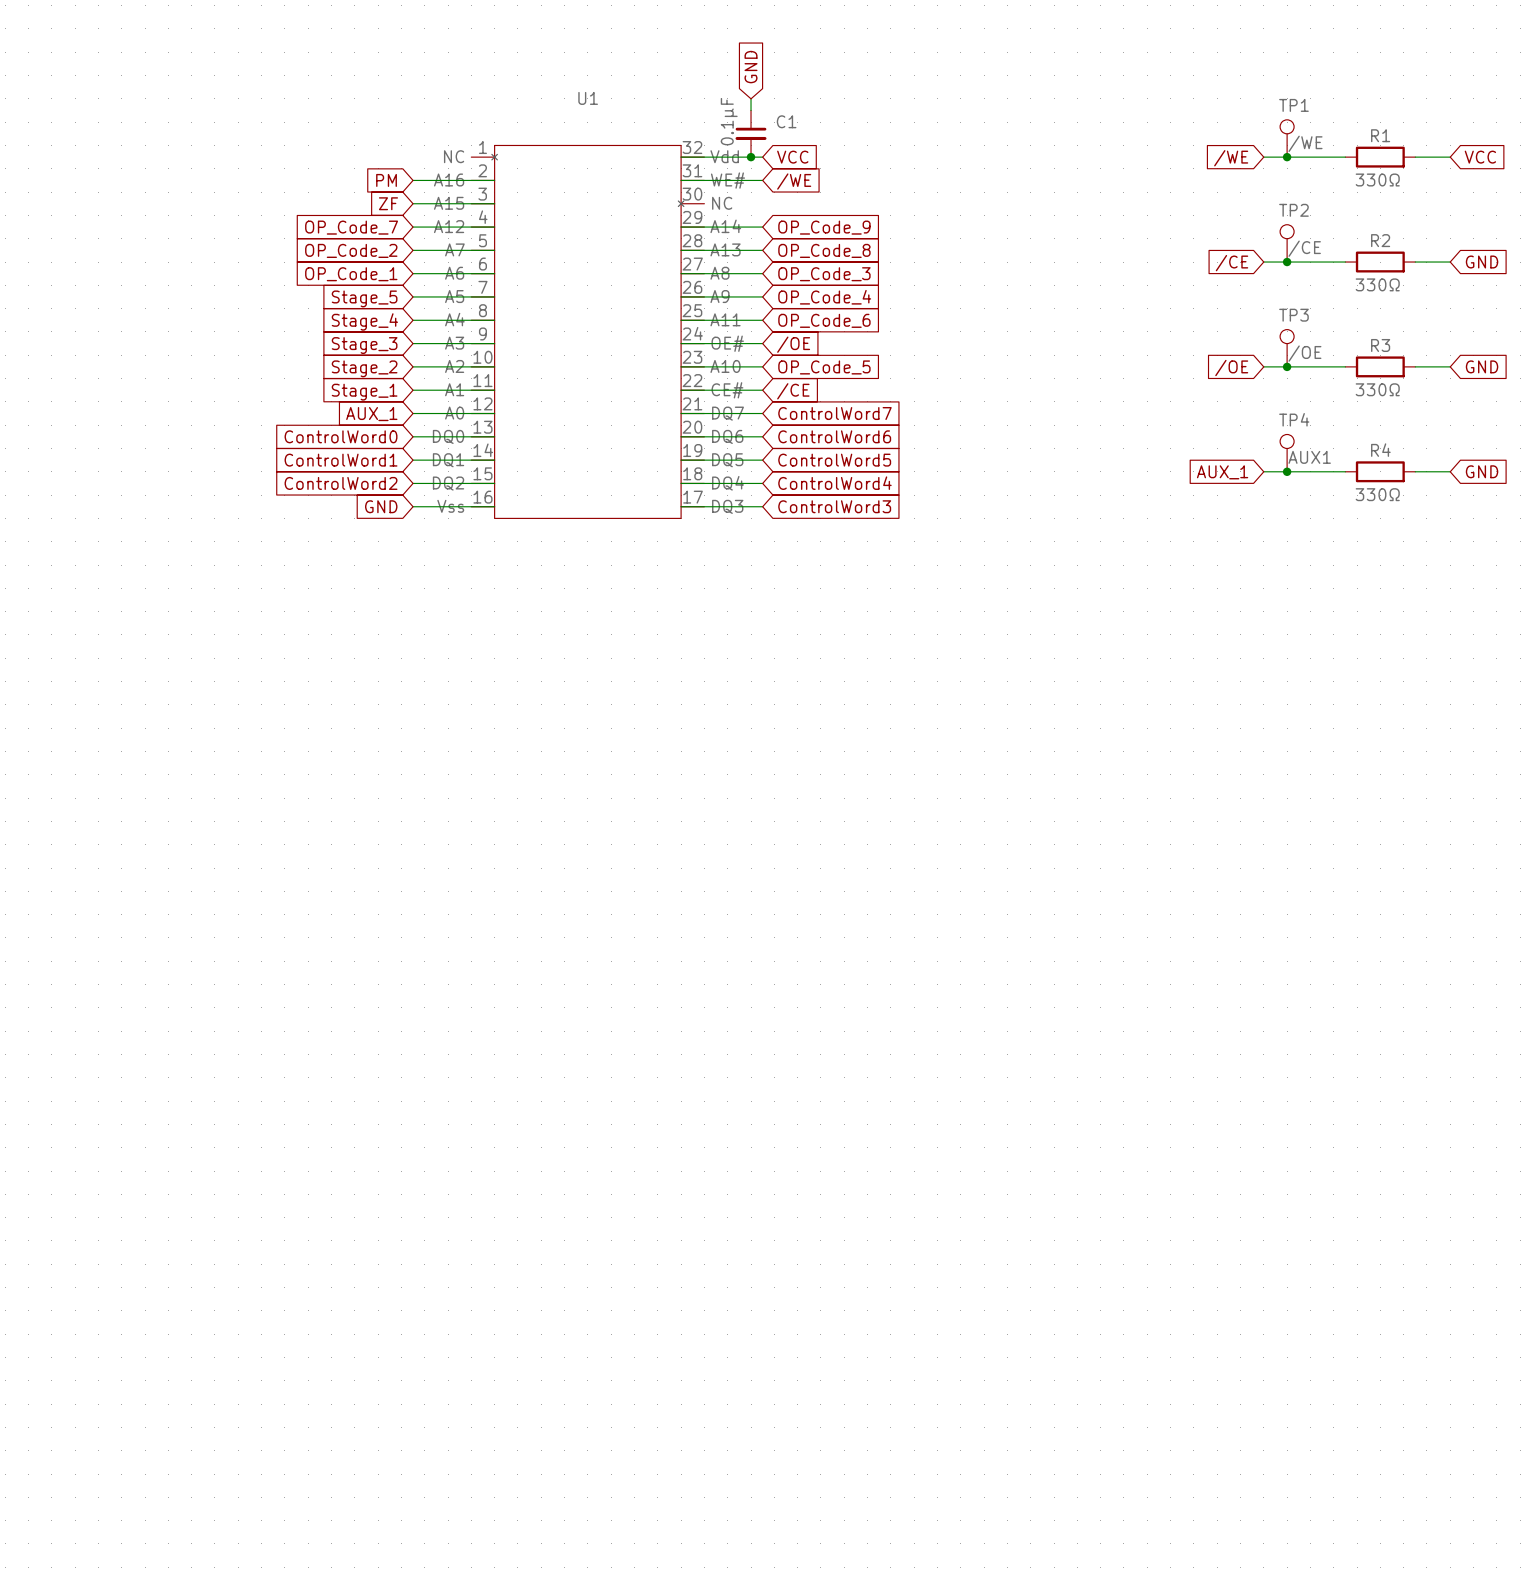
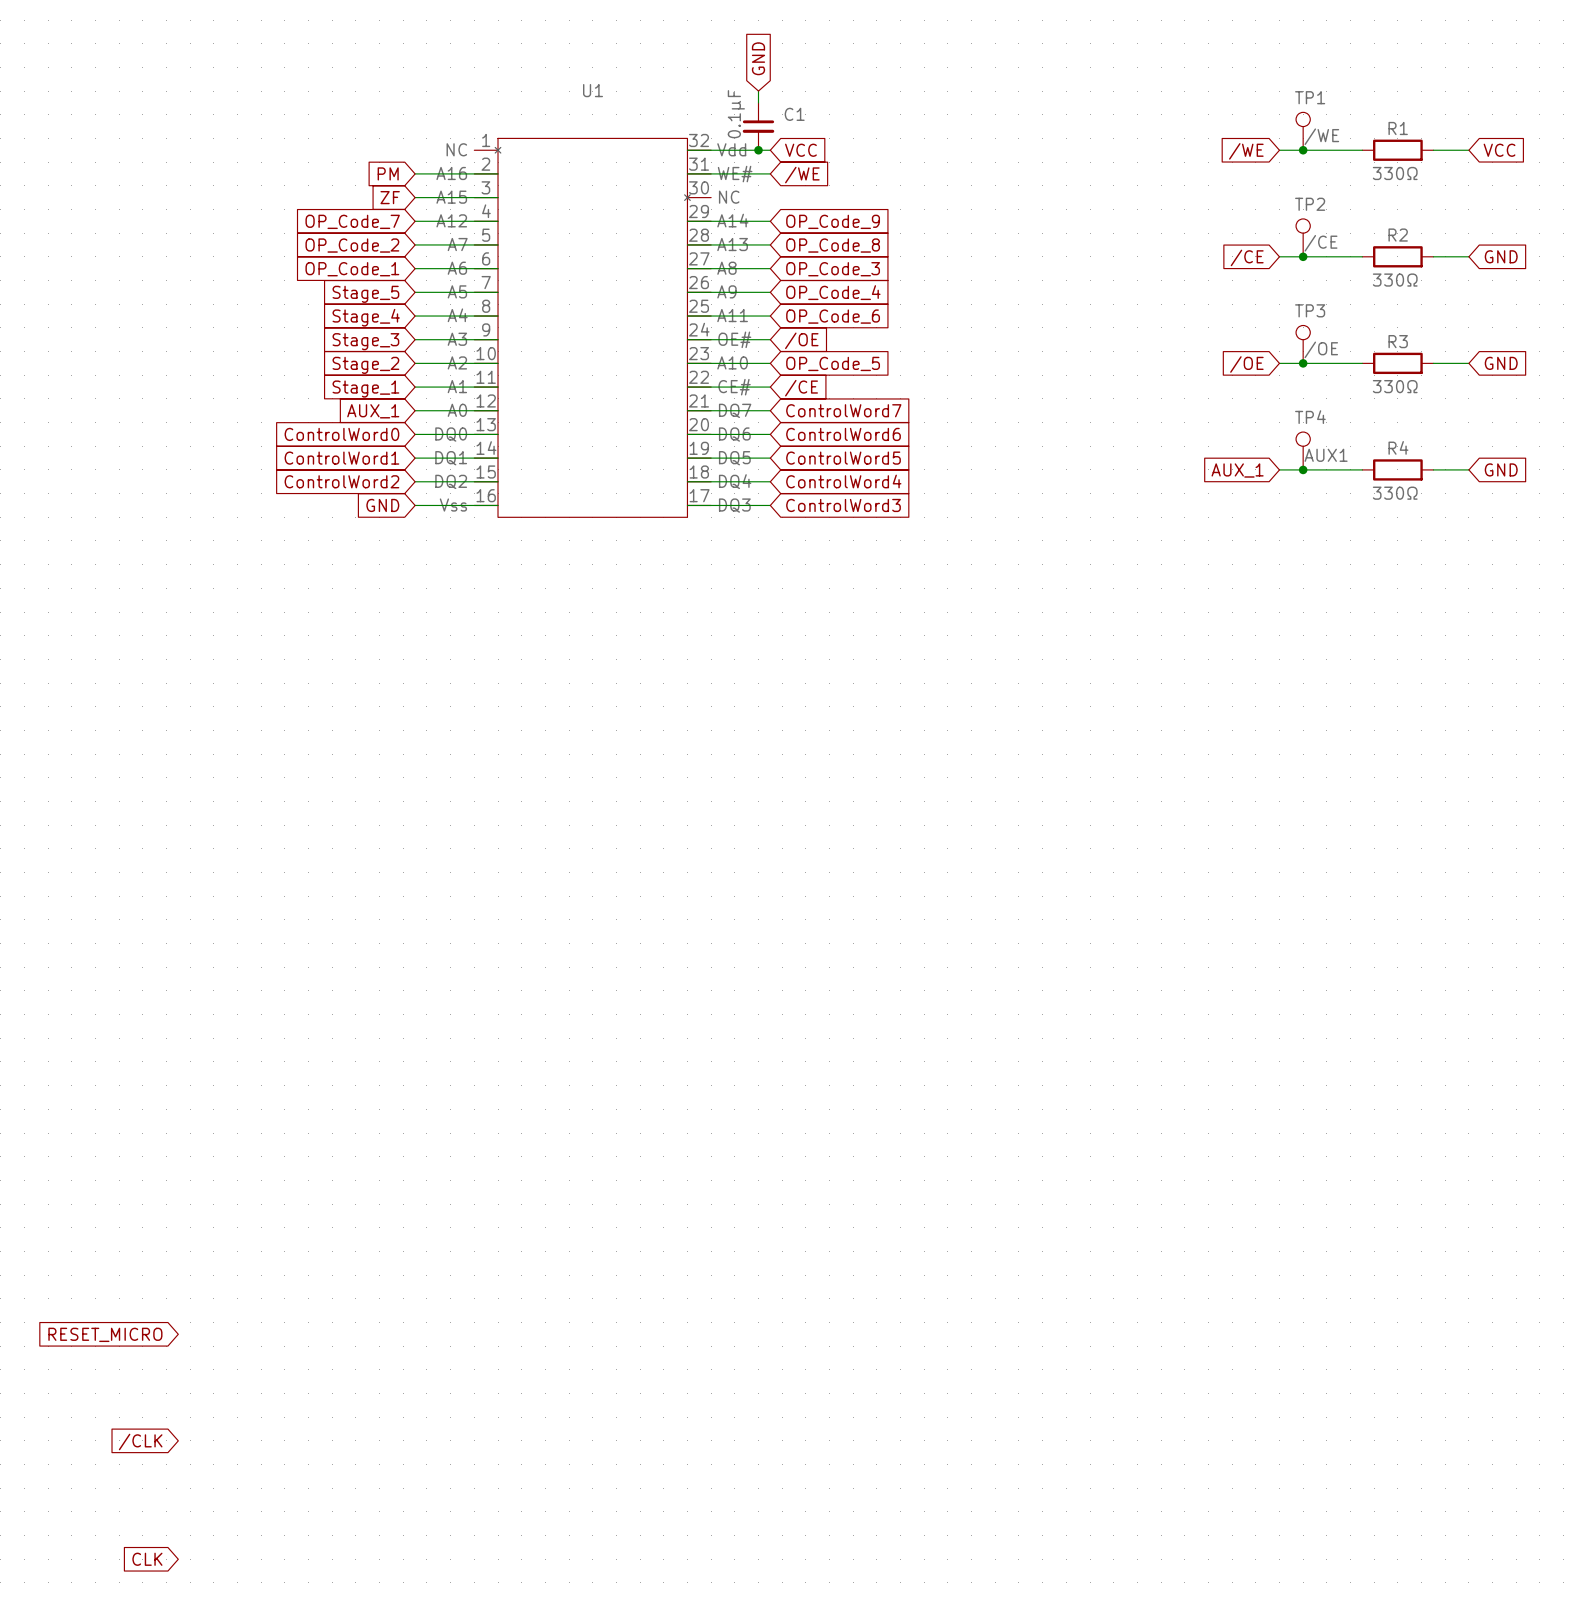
global label: none -> RESET_MICRO (105, 1334)
global label: none -> /CLK (140, 1441)
global label: none -> CLK (147, 1559)

